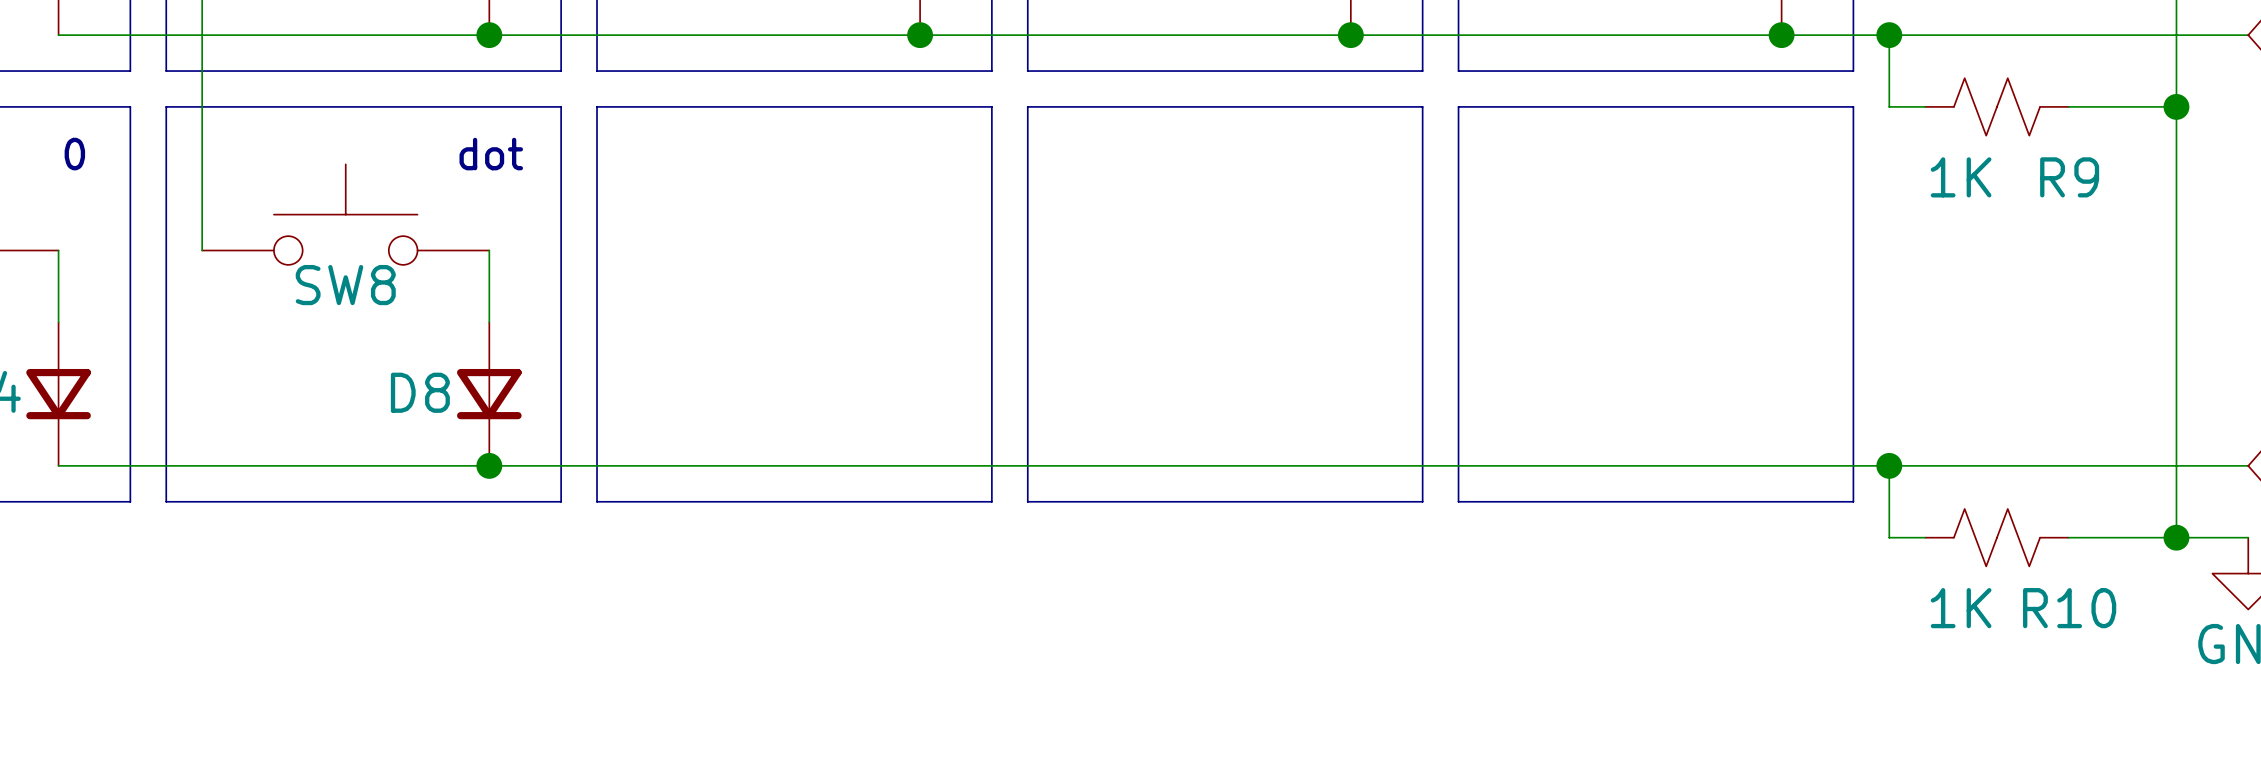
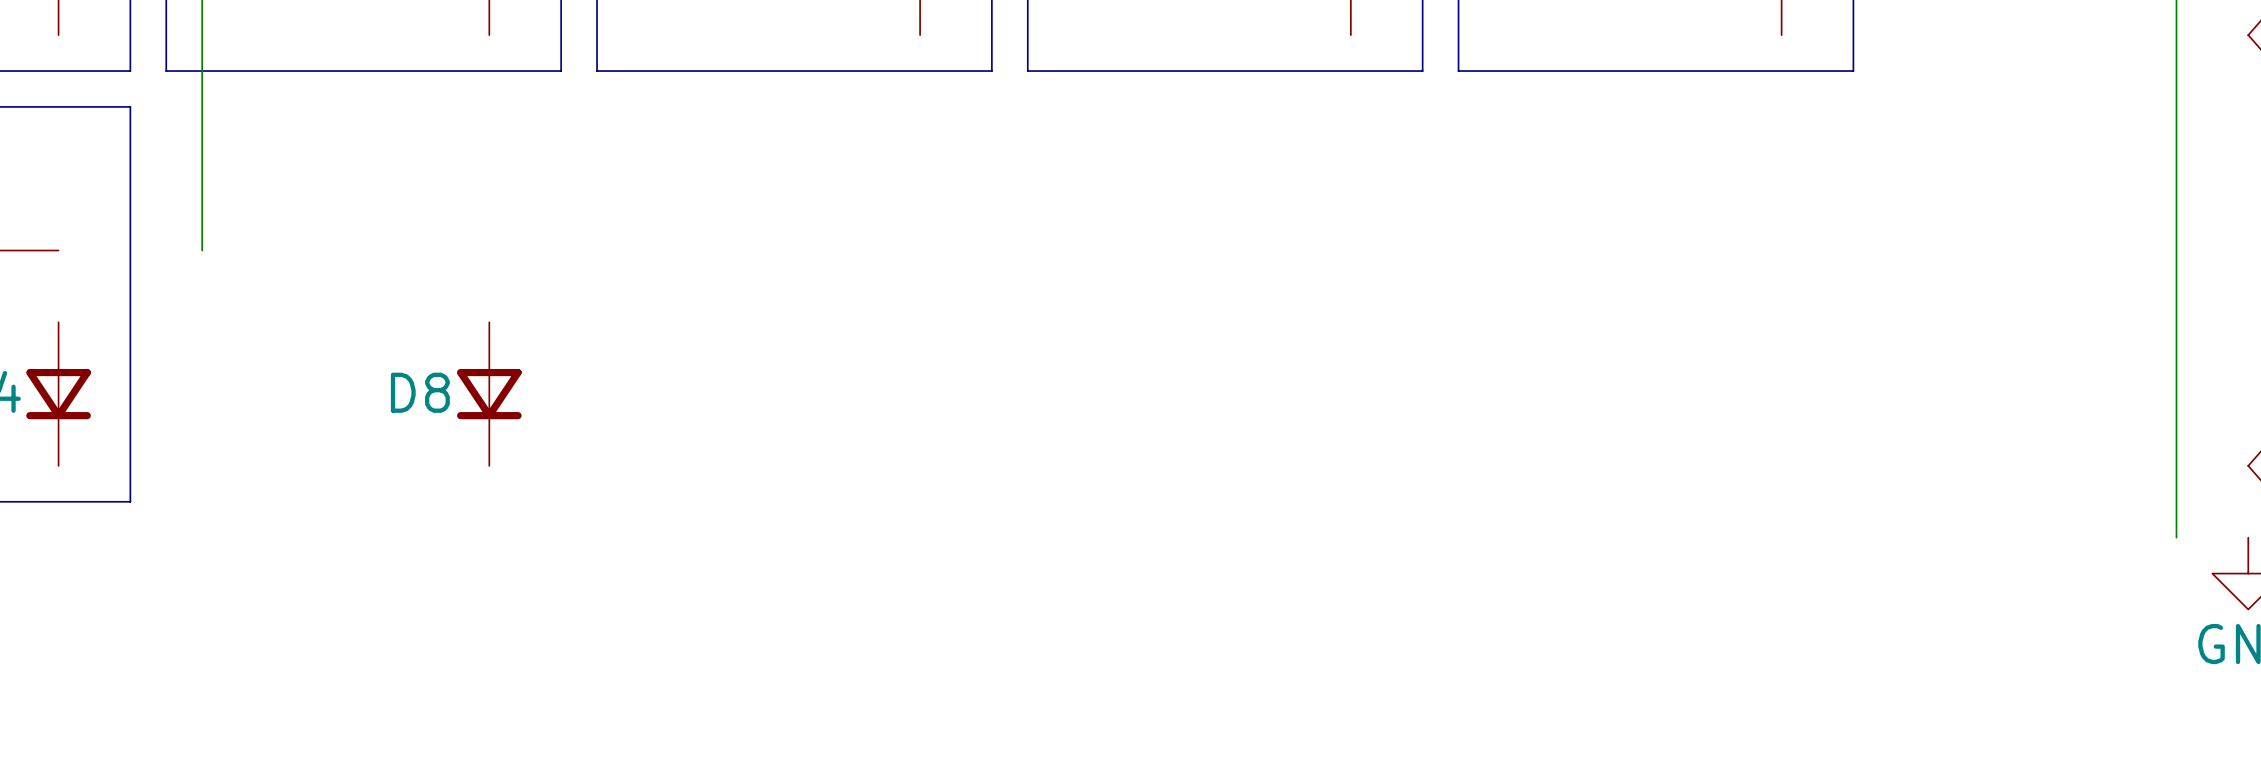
wire: (58, 35) (2248, 35) -> none
junction: (489, 35) -> none
junction: (920, 35) -> none
junction: (1350, 35) -> none
junction: (1781, 35) -> none
wire: (1889, 35) (1889, 106) (1925, 106) -> none
junction: (1889, 35) -> none
line: (166, 106) (166, 501) (561, 501) (561, 106) (166, 106) -> none
line: (597, 106) (597, 501) (991, 501) (991, 106) (597, 106) -> none
line: (1027, 106) (1027, 501) (1422, 501) (1422, 106) (1027, 106) -> none
line: (1458, 106) (1458, 501) (1853, 501) (1853, 106) (1458, 106) -> none
R9: 1K (1996, 106) -> none
wire: (2068, 106) (2176, 106) -> none
junction: (2176, 106) -> none
text: 0 (74, 154) -> none
text: dot (491, 154) -> none
SW8: (345, 214) -> none
wire: (58, 250) (58, 322) -> none
wire: (489, 250) (489, 322) -> none
wire: (58, 465) (2248, 465) -> none
junction: (489, 465) -> none
wire: (1889, 465) (1889, 537) (1925, 537) -> none
junction: (1889, 465) -> none
R10: 1K (1996, 537) -> none
wire: (2068, 537) (2248, 537) -> none
junction: (2176, 537) -> none

